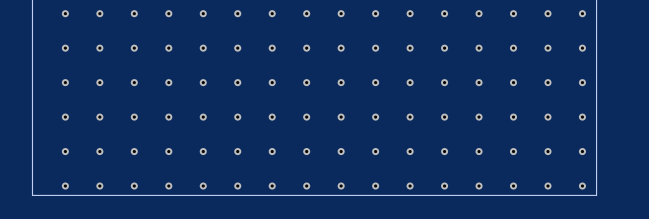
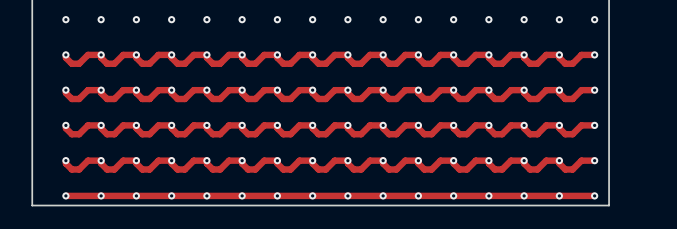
track: none -> (65, 54) (65, 57) (71, 63) (79, 63) (88, 54) (101, 54) (101, 57) (107, 63) (114, 63) (123, 54) (136, 54) (136, 57) (142, 63) (149, 63) (158, 54) (171, 54) (171, 57) (177, 63) (184, 63) (193, 54) (206, 54) (206, 57) (212, 63) (220, 63) (229, 54) (242, 54) (242, 57) (248, 63) (255, 63) (264, 54) (277, 54) (277, 57) (283, 63) (290, 63) (299, 54) (312, 54) (312, 57) (318, 63) (325, 63) (334, 54) (347, 54) (347, 57) (353, 63) (361, 63) (370, 54) (383, 54) (383, 57) (389, 63) (396, 63) (405, 54) (418, 54) (418, 57) (424, 63) (431, 63) (440, 54) (453, 54) (453, 57) (459, 63) (466, 63) (475, 54) (488, 54) (488, 57) (494, 63) (502, 63) (511, 54) (524, 54) (524, 57) (530, 63) (537, 63) (546, 54) (559, 54) (559, 57) (565, 63) (572, 63) (581, 54) (594, 54)
track: none -> (65, 90) (65, 93) (71, 98) (79, 98) (88, 90) (101, 90) (101, 93) (107, 98) (114, 98) (123, 90) (136, 90) (136, 93) (142, 98) (149, 98) (158, 90) (171, 90) (171, 93) (177, 98) (184, 98) (193, 90) (206, 90) (206, 93) (212, 98) (220, 98) (229, 90) (242, 90) (242, 93) (248, 98) (255, 98) (264, 90) (277, 90) (277, 93) (283, 98) (290, 98) (299, 90) (312, 90) (312, 93) (318, 98) (325, 98) (334, 90) (347, 90) (347, 93) (353, 98) (361, 98) (370, 90) (383, 90) (383, 93) (389, 98) (396, 98) (405, 90) (418, 90) (418, 93) (424, 98) (431, 98) (440, 90) (453, 90) (453, 93) (459, 98) (466, 98) (475, 90) (488, 90) (488, 93) (494, 98) (502, 98) (511, 90) (524, 90) (524, 93) (530, 98) (537, 98) (546, 90) (559, 90) (559, 93) (565, 98) (572, 98) (581, 90) (594, 90)
track: none -> (65, 125) (65, 128) (71, 134) (79, 134) (88, 125) (101, 125) (101, 128) (107, 134) (114, 134) (123, 125) (136, 125) (136, 128) (142, 134) (149, 134) (158, 125) (171, 125) (171, 128) (177, 134) (184, 134) (193, 125) (206, 125) (206, 128) (212, 134) (220, 134) (229, 125) (242, 125) (242, 128) (248, 134) (255, 134) (264, 125) (277, 125) (277, 128) (283, 134) (290, 134) (299, 125) (312, 125) (312, 128) (318, 134) (325, 134) (334, 125) (347, 125) (347, 128) (353, 134) (361, 134) (370, 125) (383, 125) (383, 128) (389, 134) (396, 134) (405, 125) (418, 125) (418, 128) (424, 134) (431, 134) (440, 125) (453, 125) (453, 128) (459, 134) (466, 134) (475, 125) (488, 125) (488, 128) (494, 134) (502, 134) (511, 125) (524, 125) (524, 128) (530, 134) (537, 134) (546, 125) (559, 125) (559, 128) (565, 134) (572, 134) (581, 125) (594, 125)
track: none -> (65, 160) (65, 163) (71, 169) (79, 169) (88, 160) (101, 160) (101, 163) (107, 169) (114, 169) (123, 160) (136, 160) (136, 163) (142, 169) (149, 169) (158, 160) (171, 160) (171, 163) (177, 169) (184, 169) (193, 160) (206, 160) (206, 163) (212, 169) (220, 169) (229, 160) (242, 160) (242, 163) (248, 169) (255, 169) (264, 160) (277, 160) (277, 163) (283, 169) (290, 169) (299, 160) (312, 160) (312, 163) (318, 169) (325, 169) (334, 160) (347, 160) (347, 163) (353, 169) (361, 169) (370, 160) (383, 160) (383, 163) (389, 169) (396, 169) (405, 160) (418, 160) (418, 163) (424, 169) (431, 169) (440, 160) (453, 160) (453, 163) (459, 169) (466, 169) (475, 160) (488, 160) (488, 163) (494, 169) (502, 169) (511, 160) (524, 160) (524, 163) (530, 169) (537, 169) (546, 160) (559, 160) (559, 163) (565, 169) (572, 169) (581, 160) (594, 160)
track: none -> (65, 195) (594, 195)

